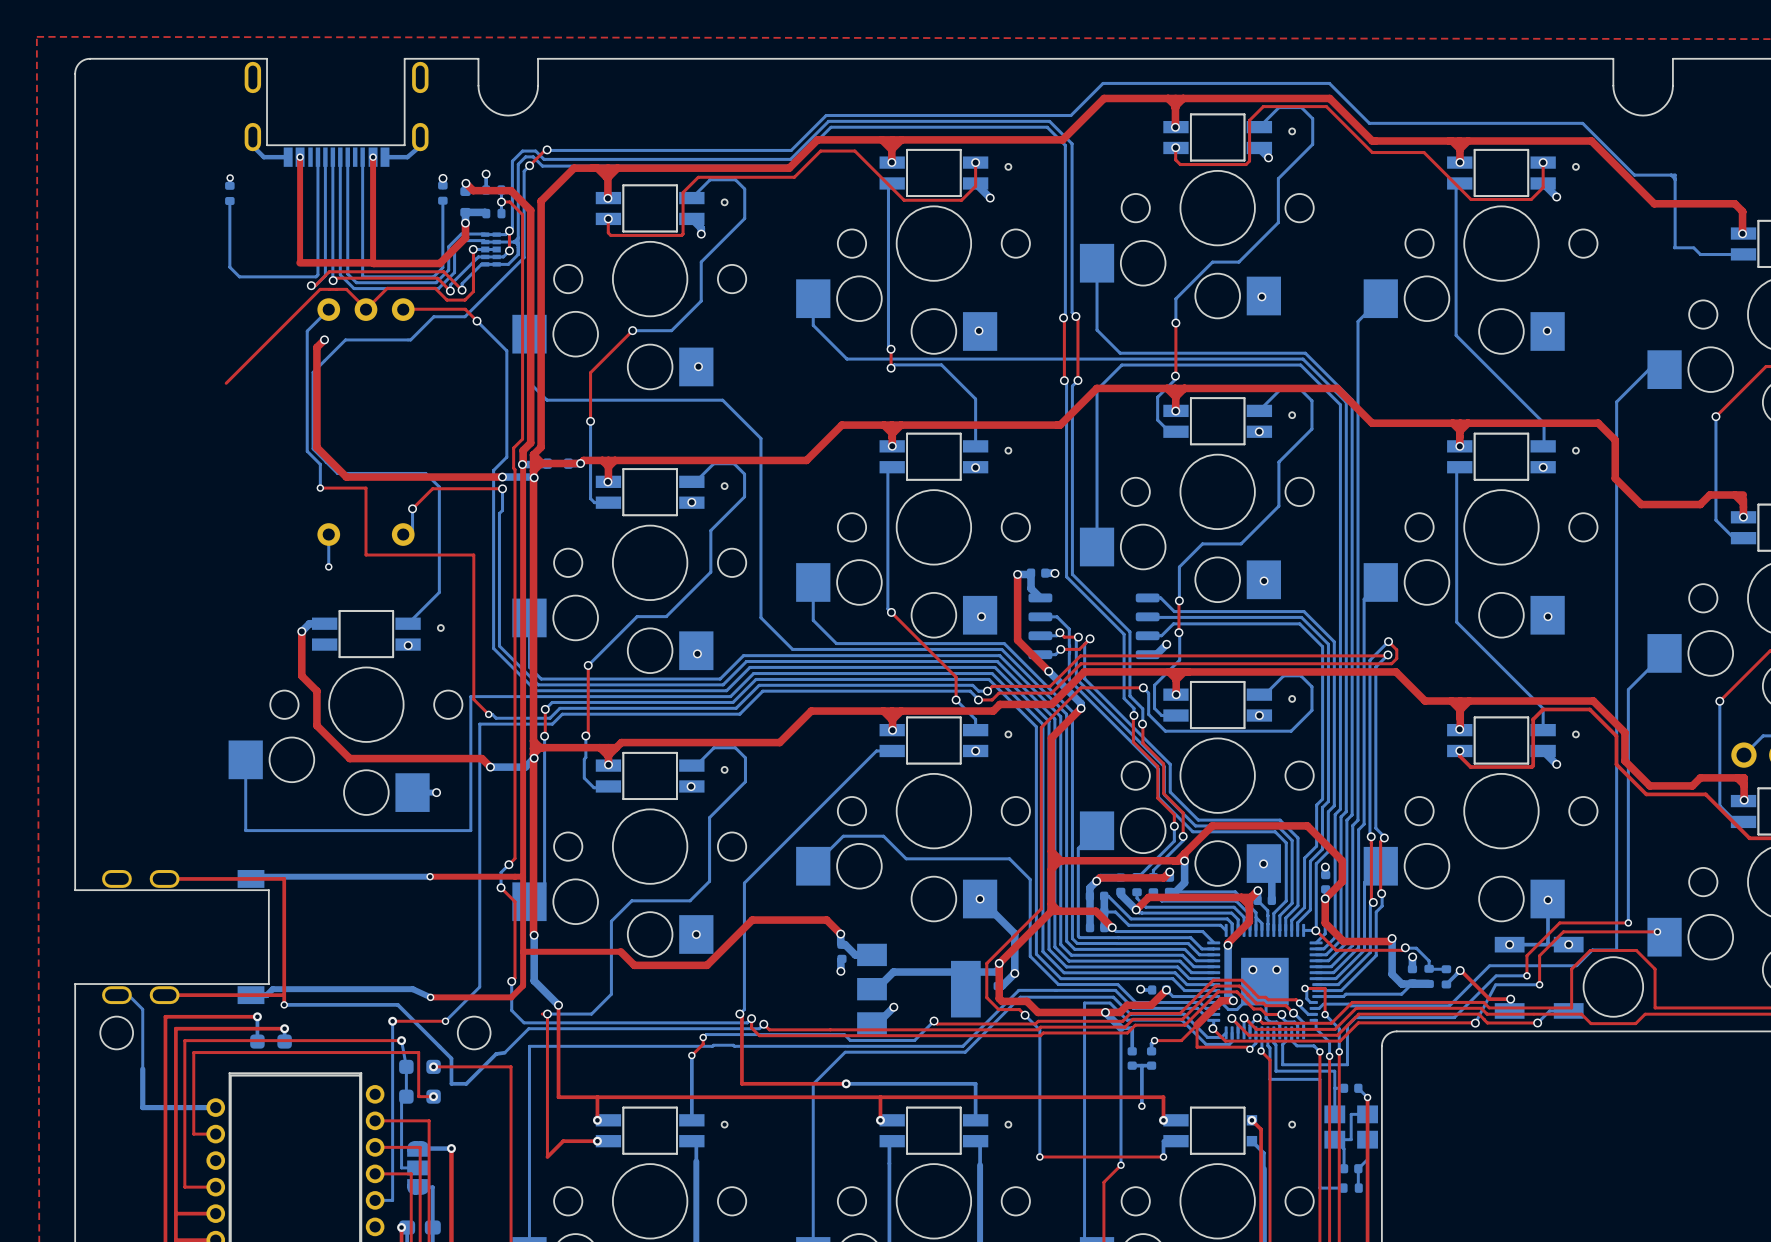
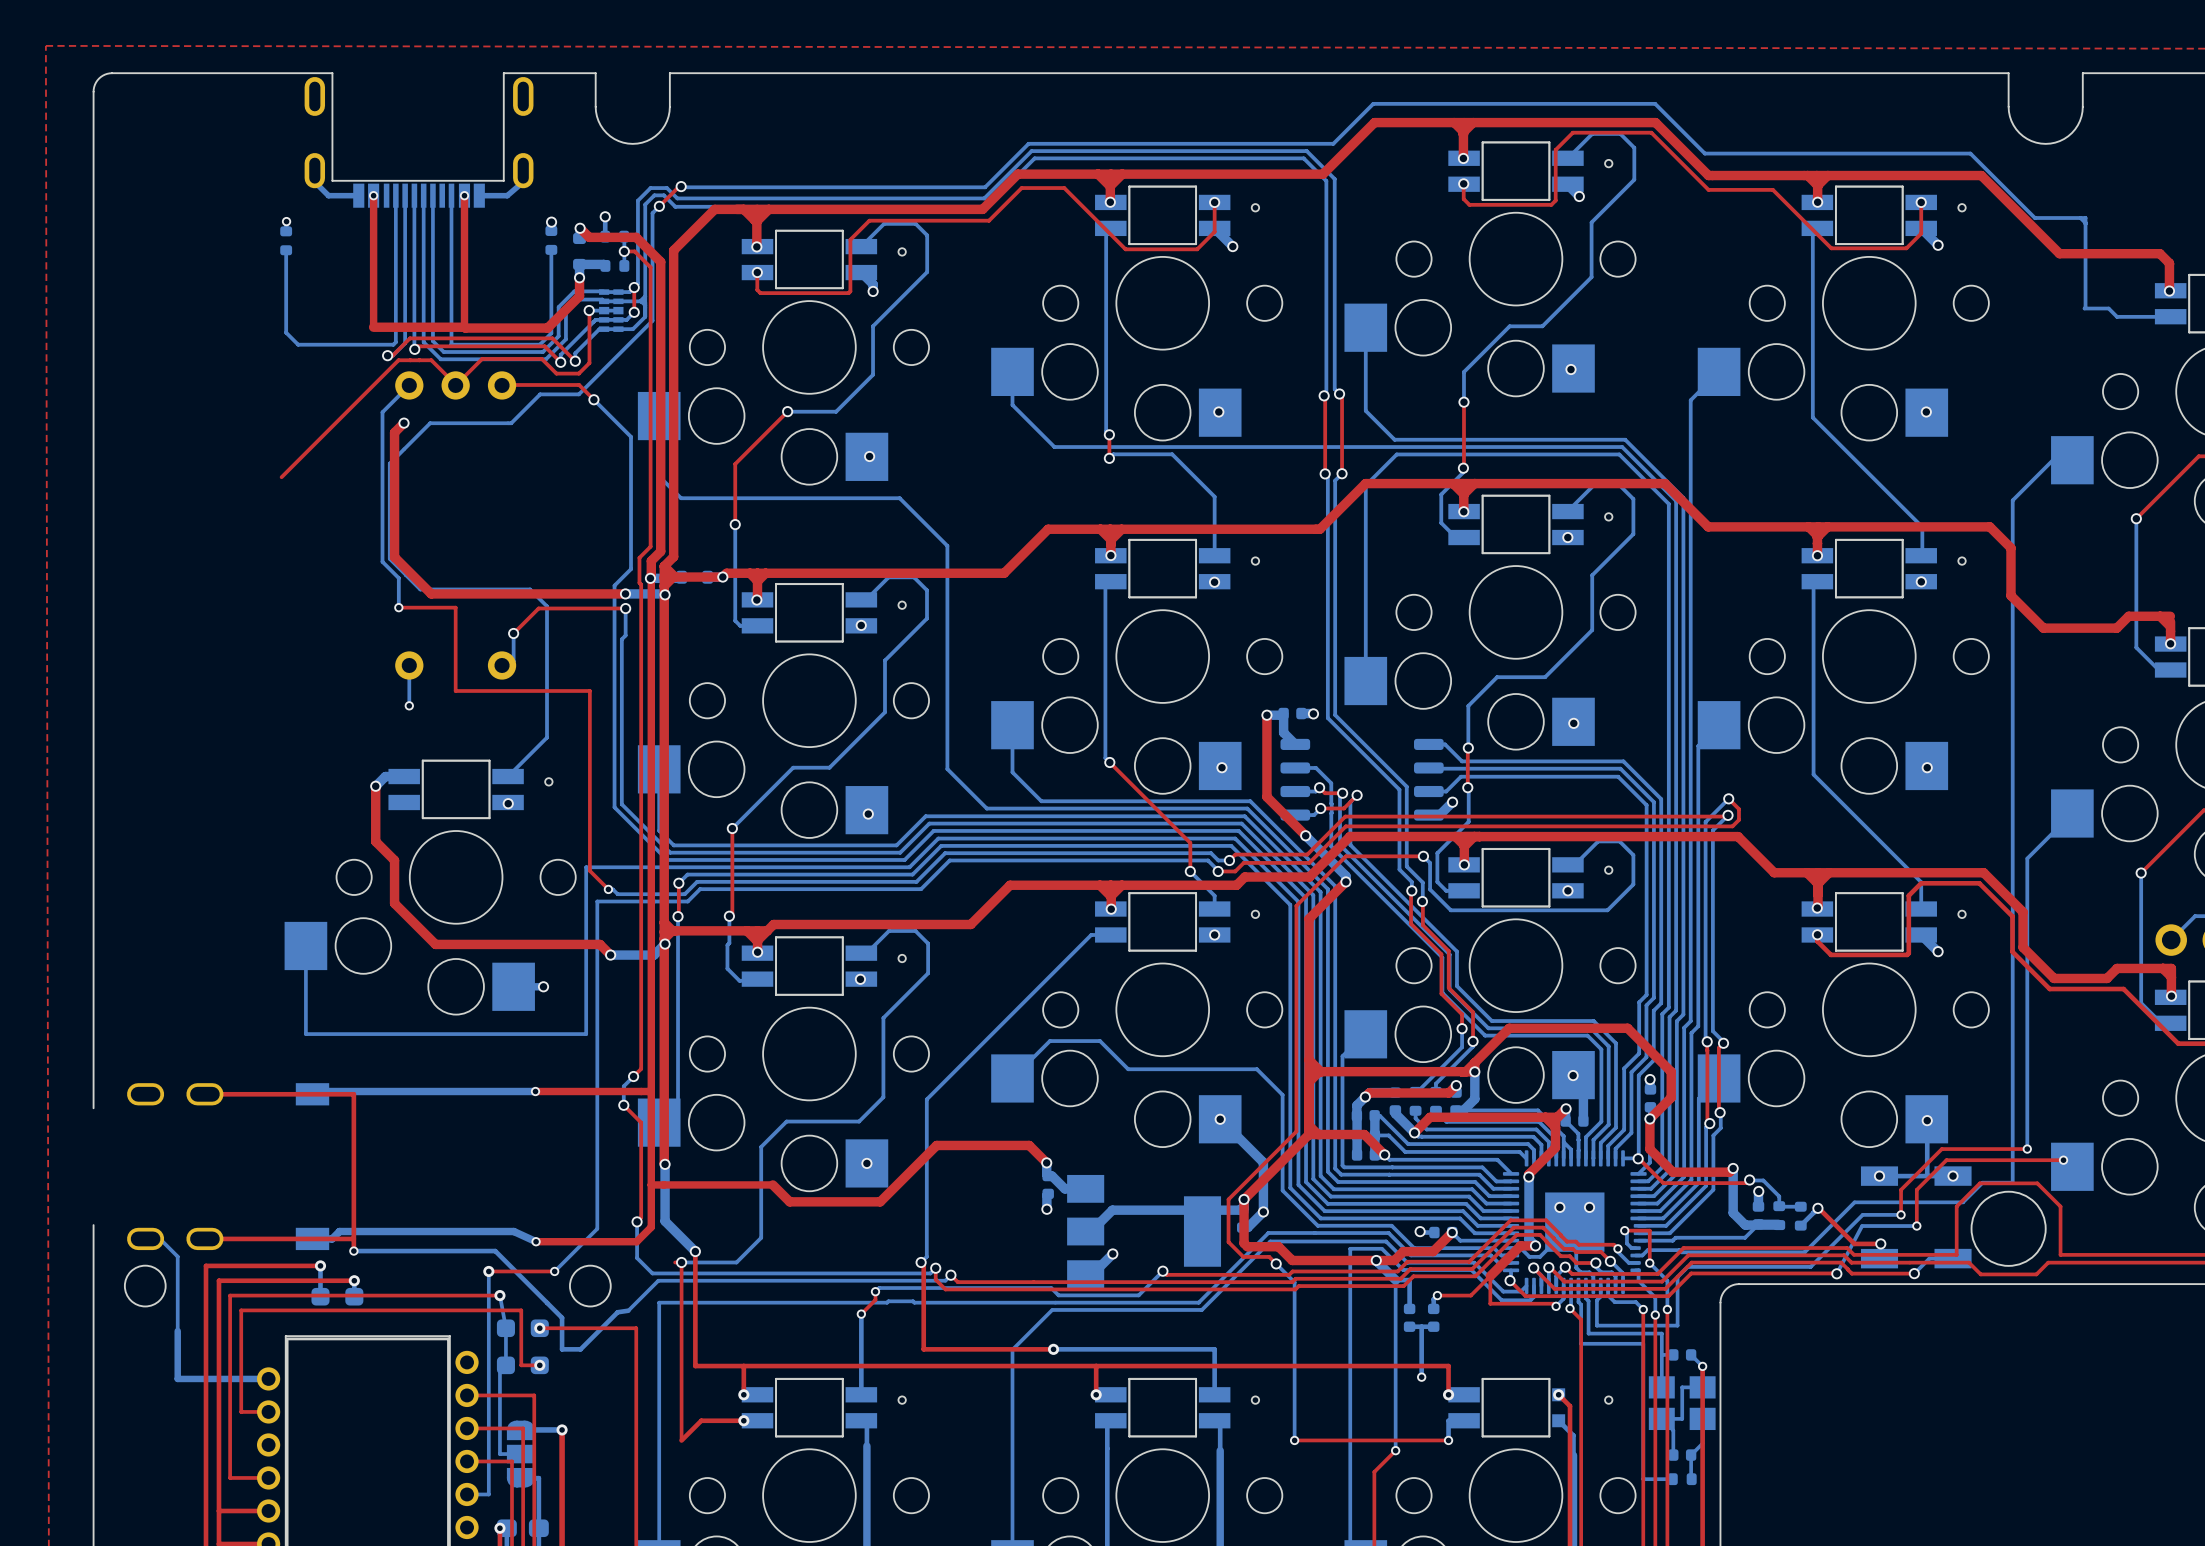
board edge: (75, 890) (268, 890) (268, 984) (75, 984) -> none

